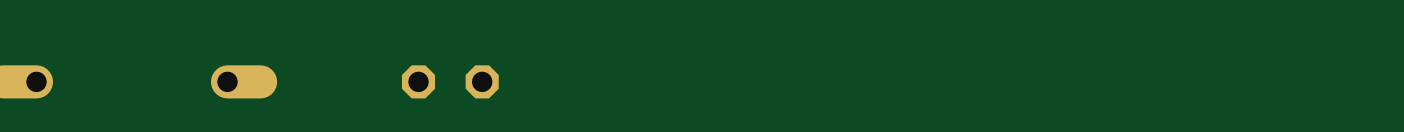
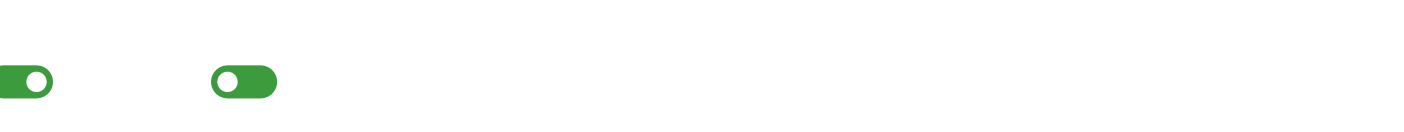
part: (450, 81) -> none

